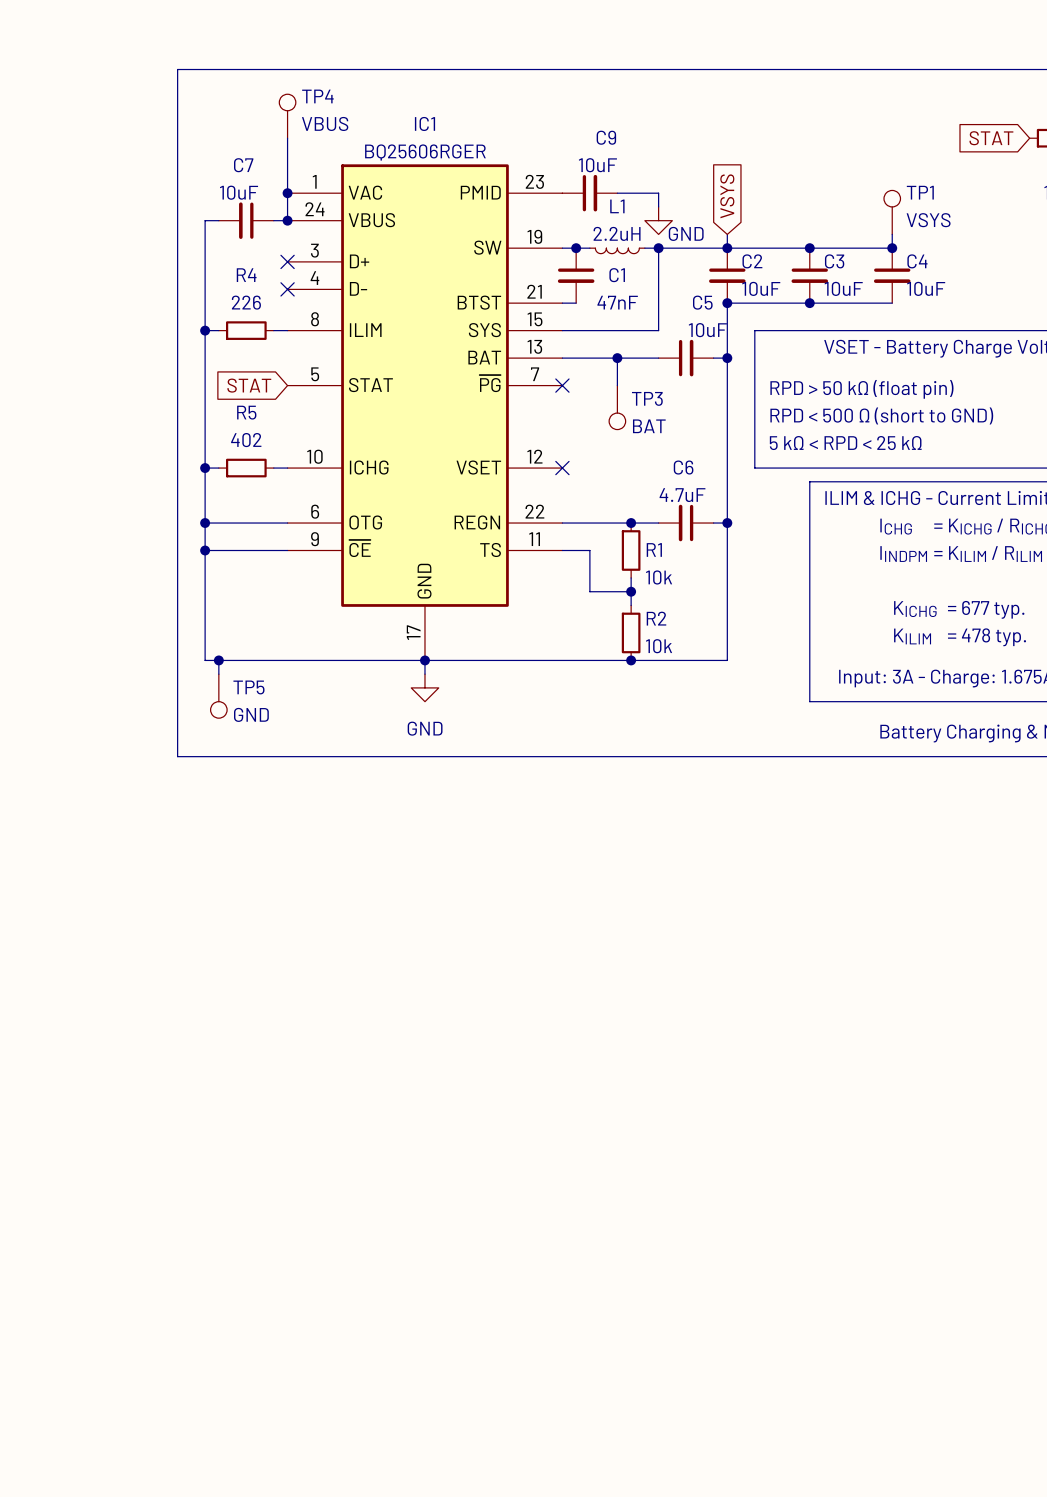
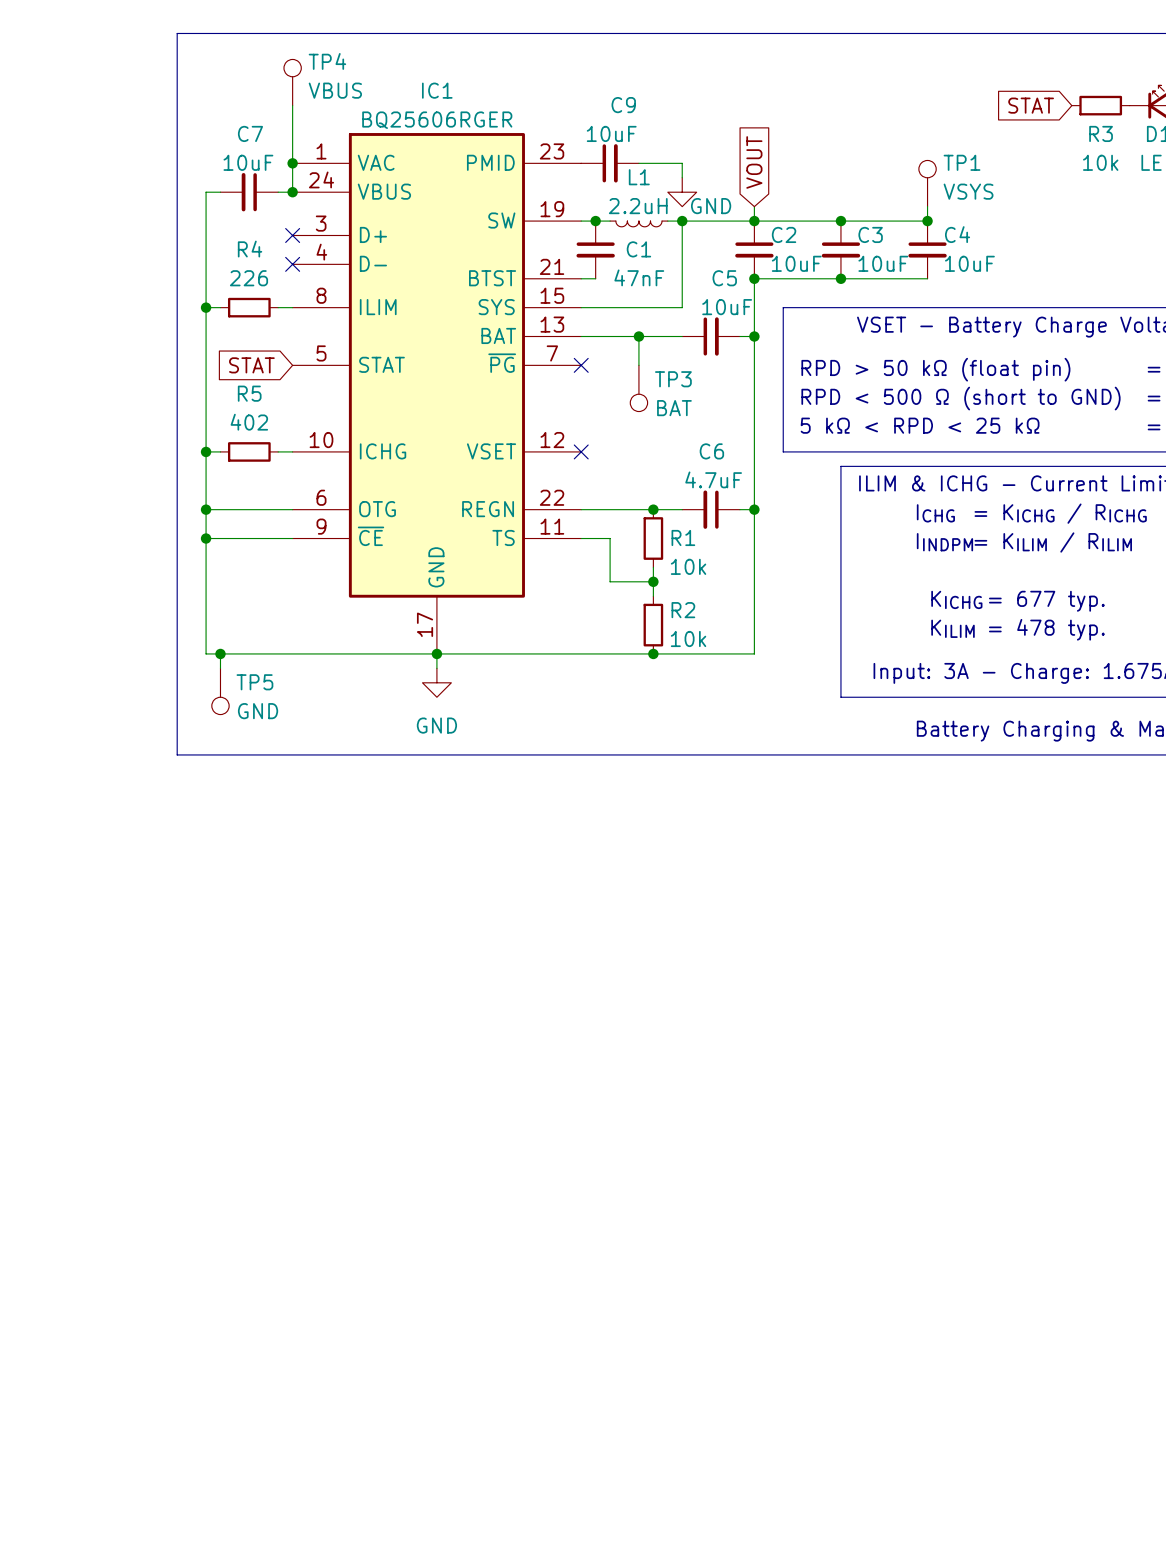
global label: VSYS (727, 196) -> VOUT (754, 162)

